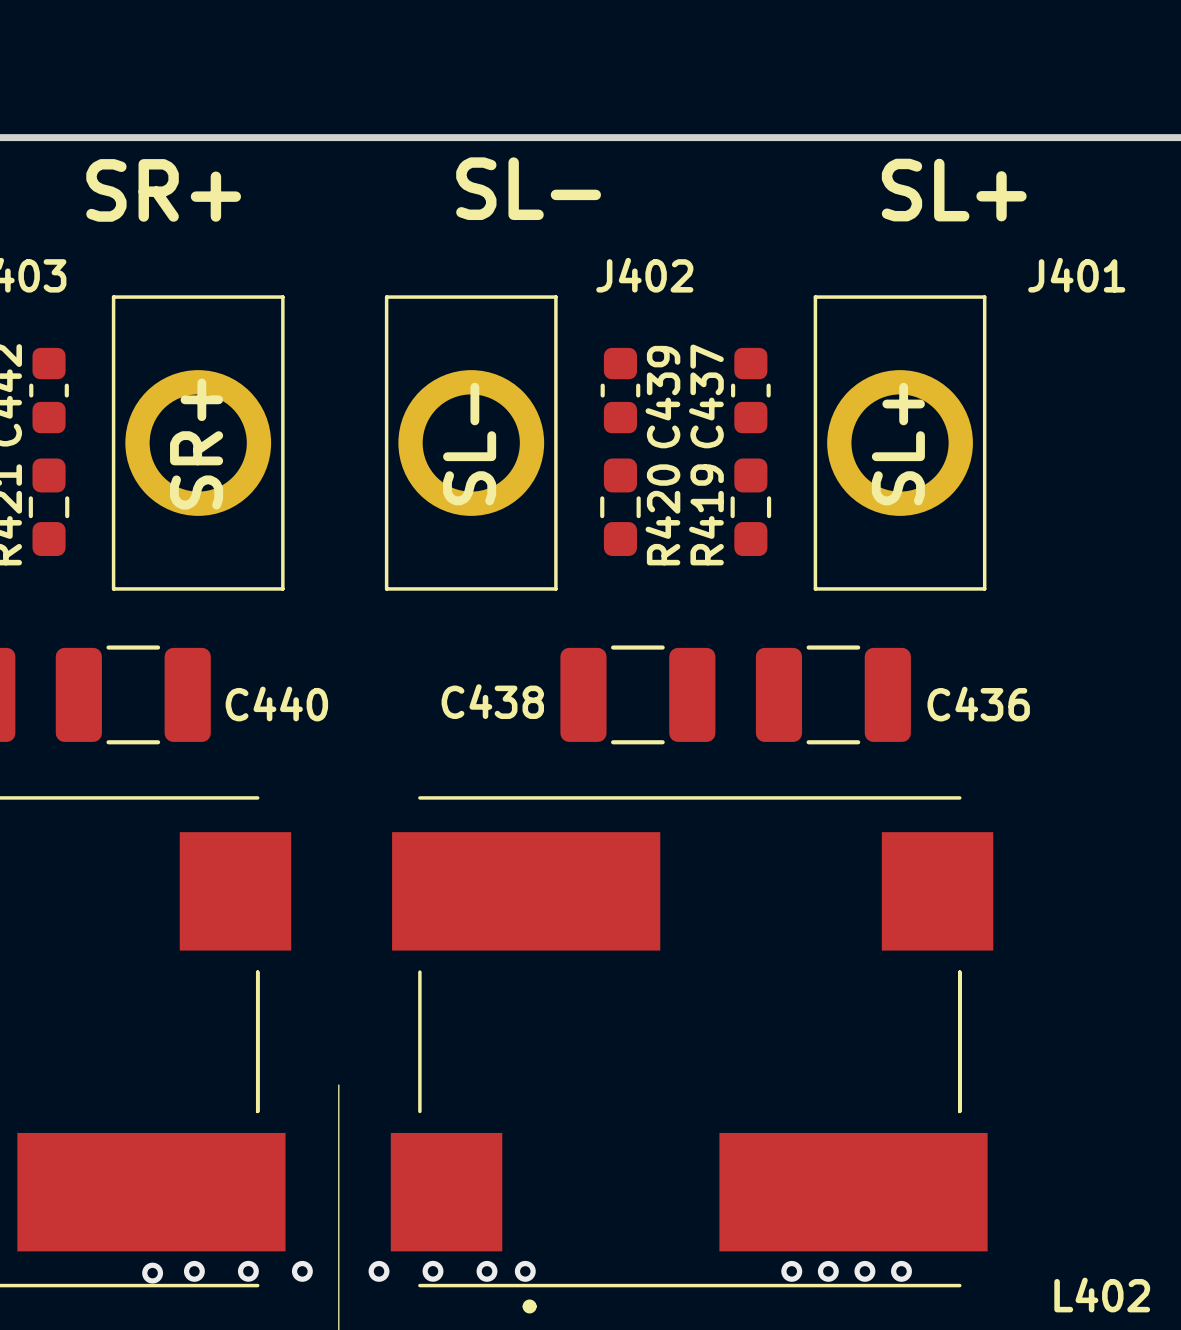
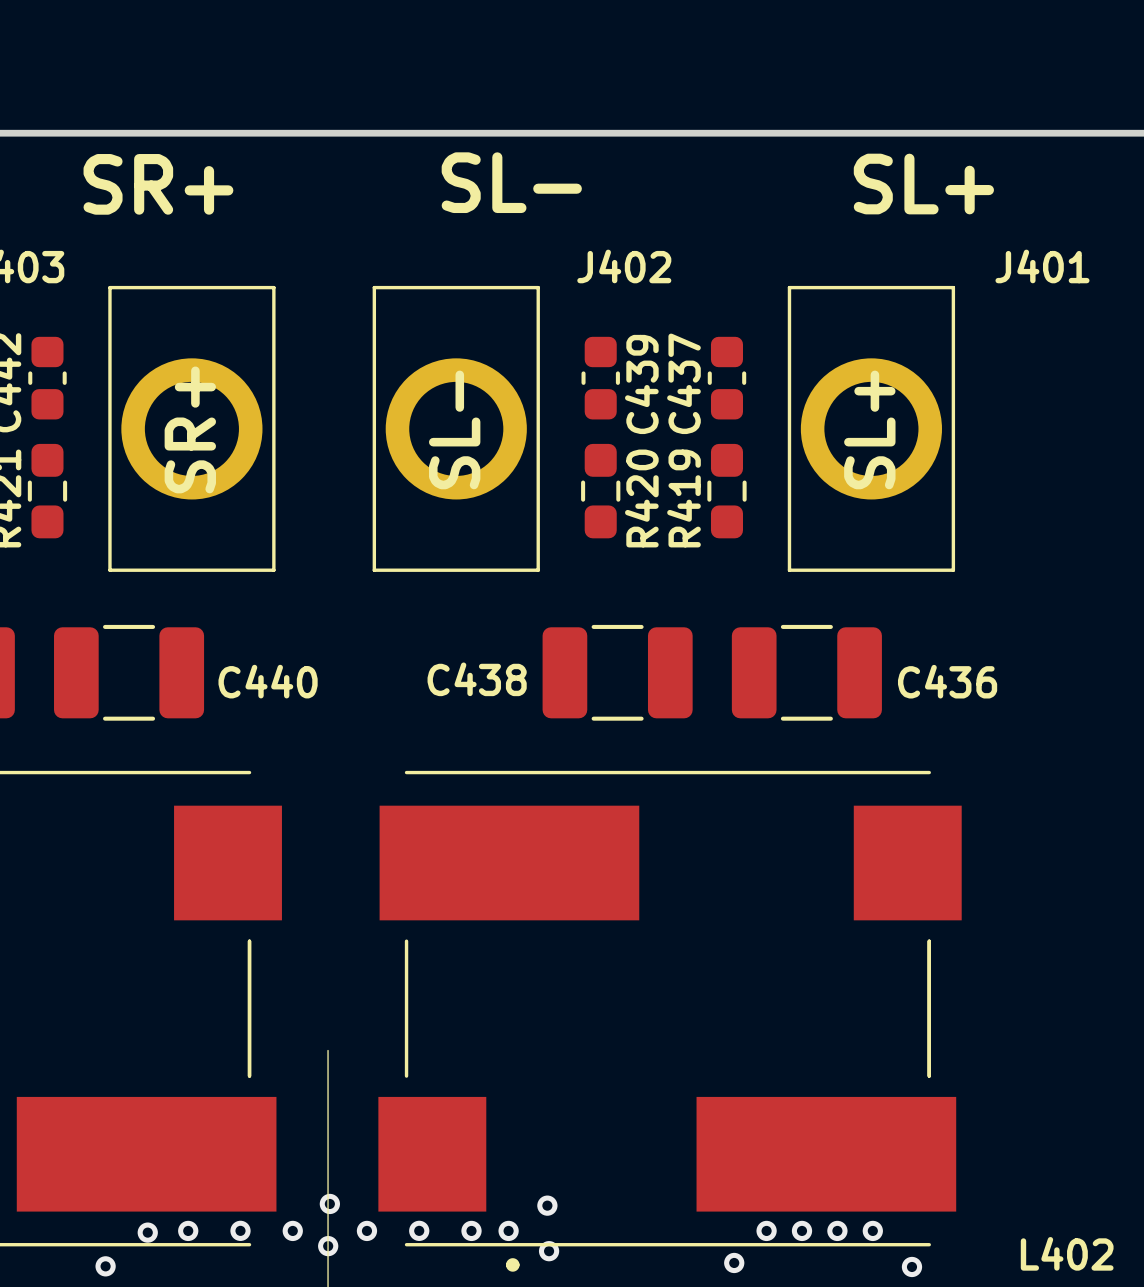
via: none -> (329, 1203)
via: none -> (547, 1205)
via: none -> (328, 1246)
via: none -> (549, 1251)
via: none -> (734, 1262)
via: none -> (105, 1266)
via: none -> (911, 1266)

